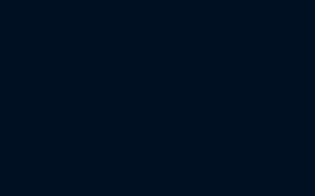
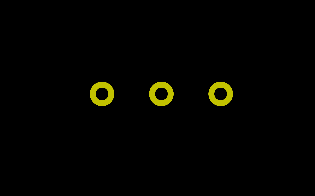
part: none -> (161, 93)

